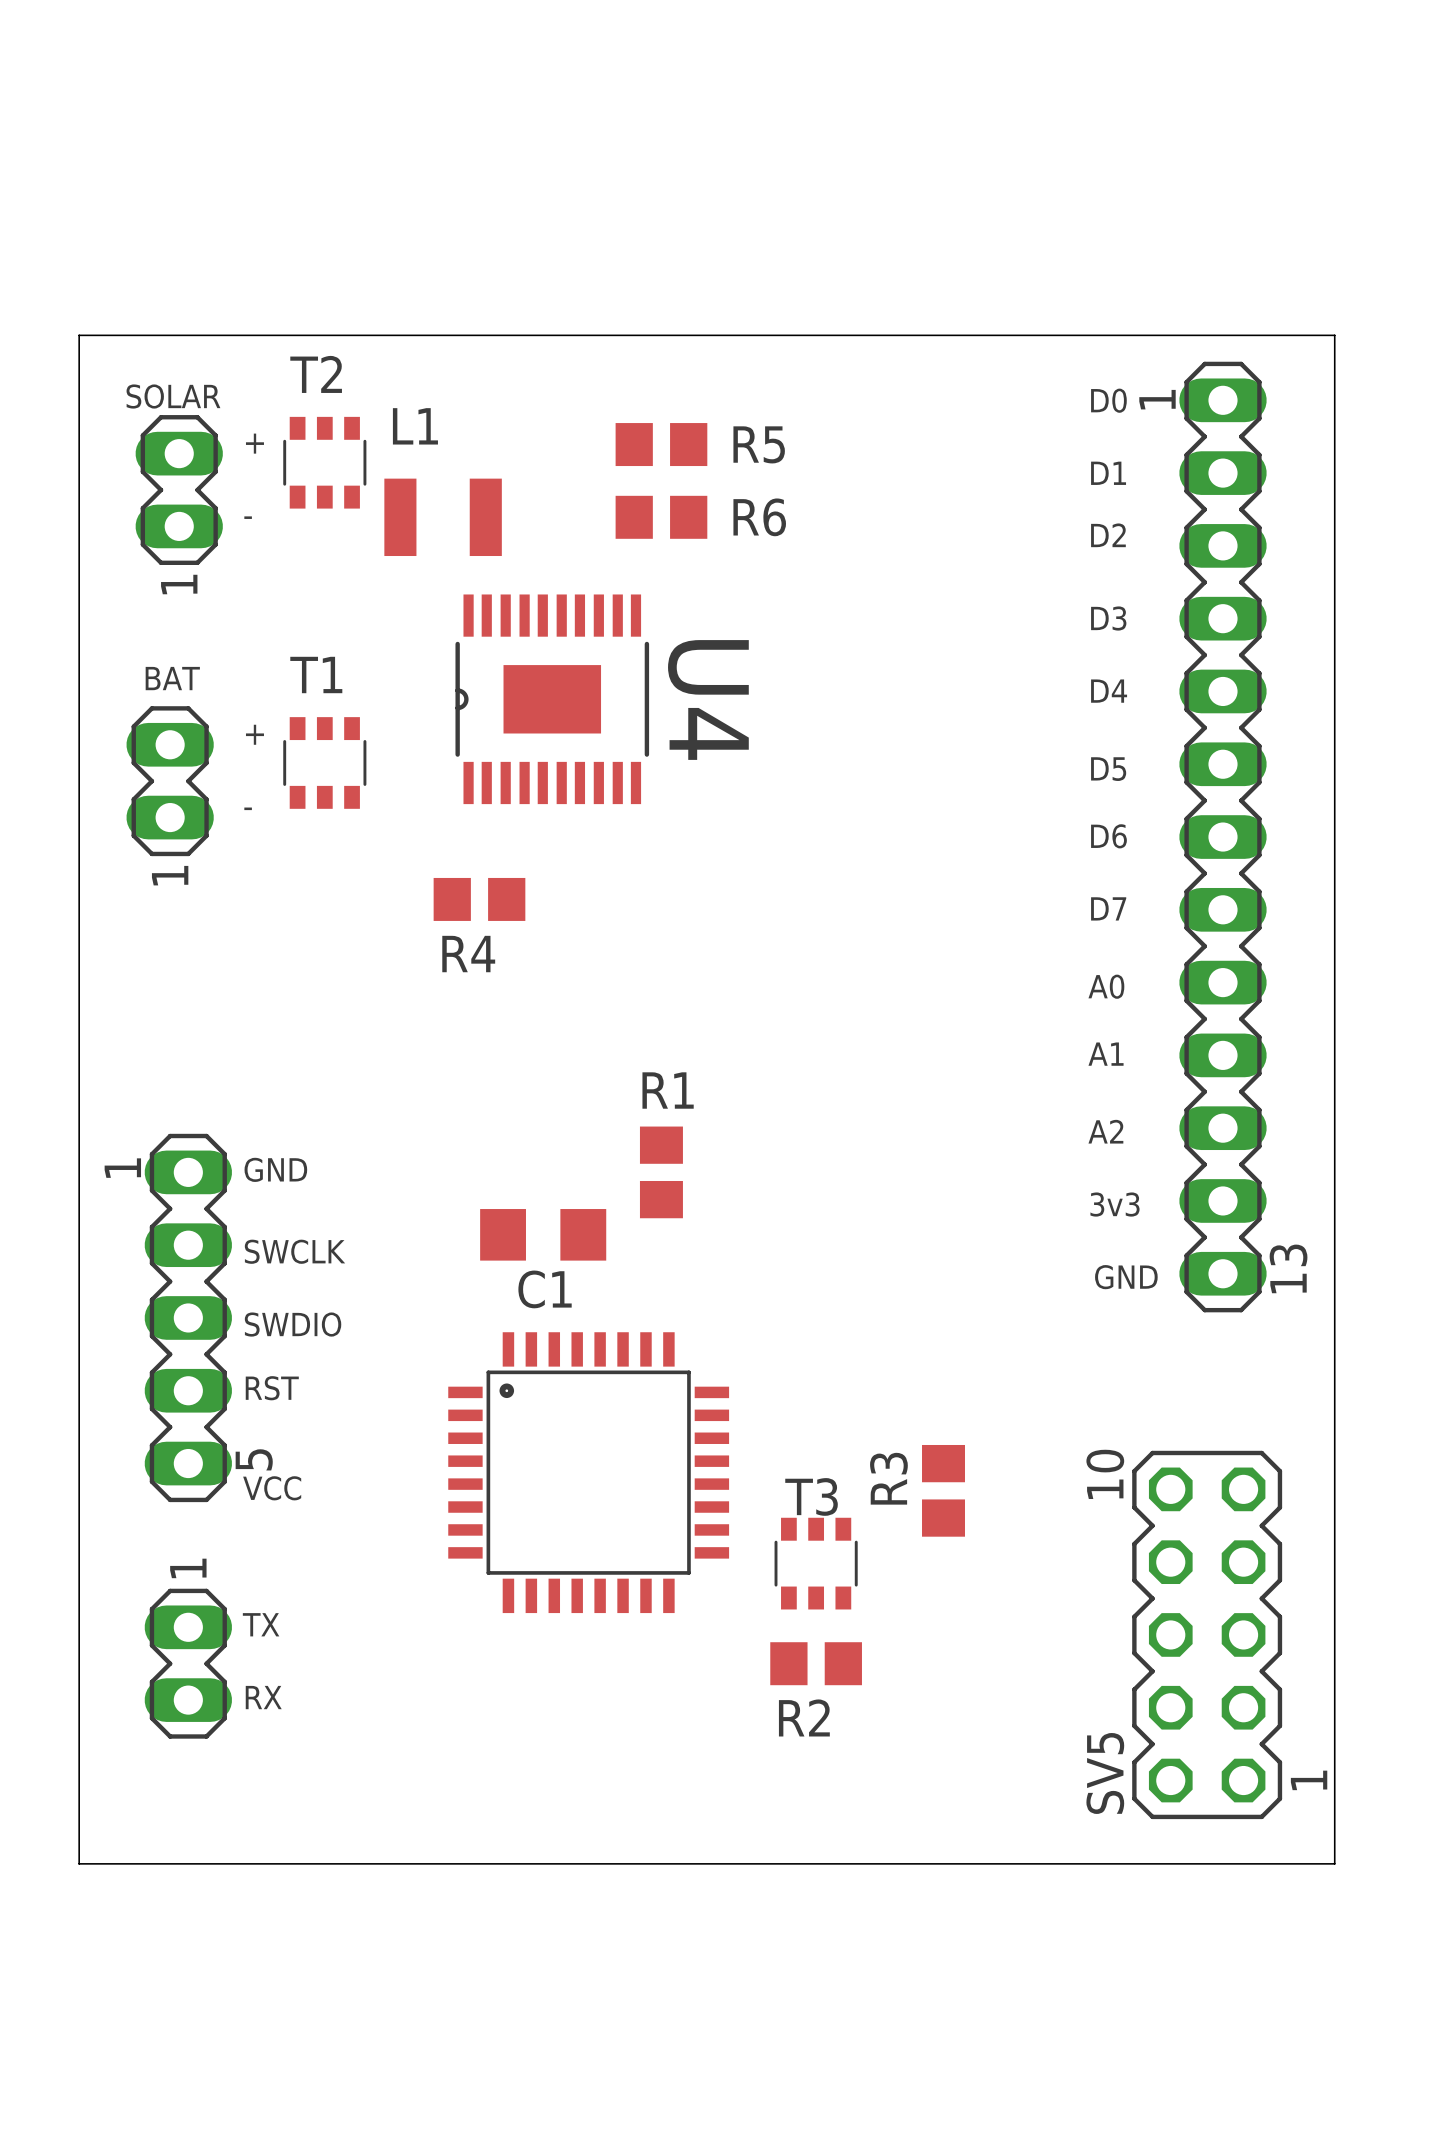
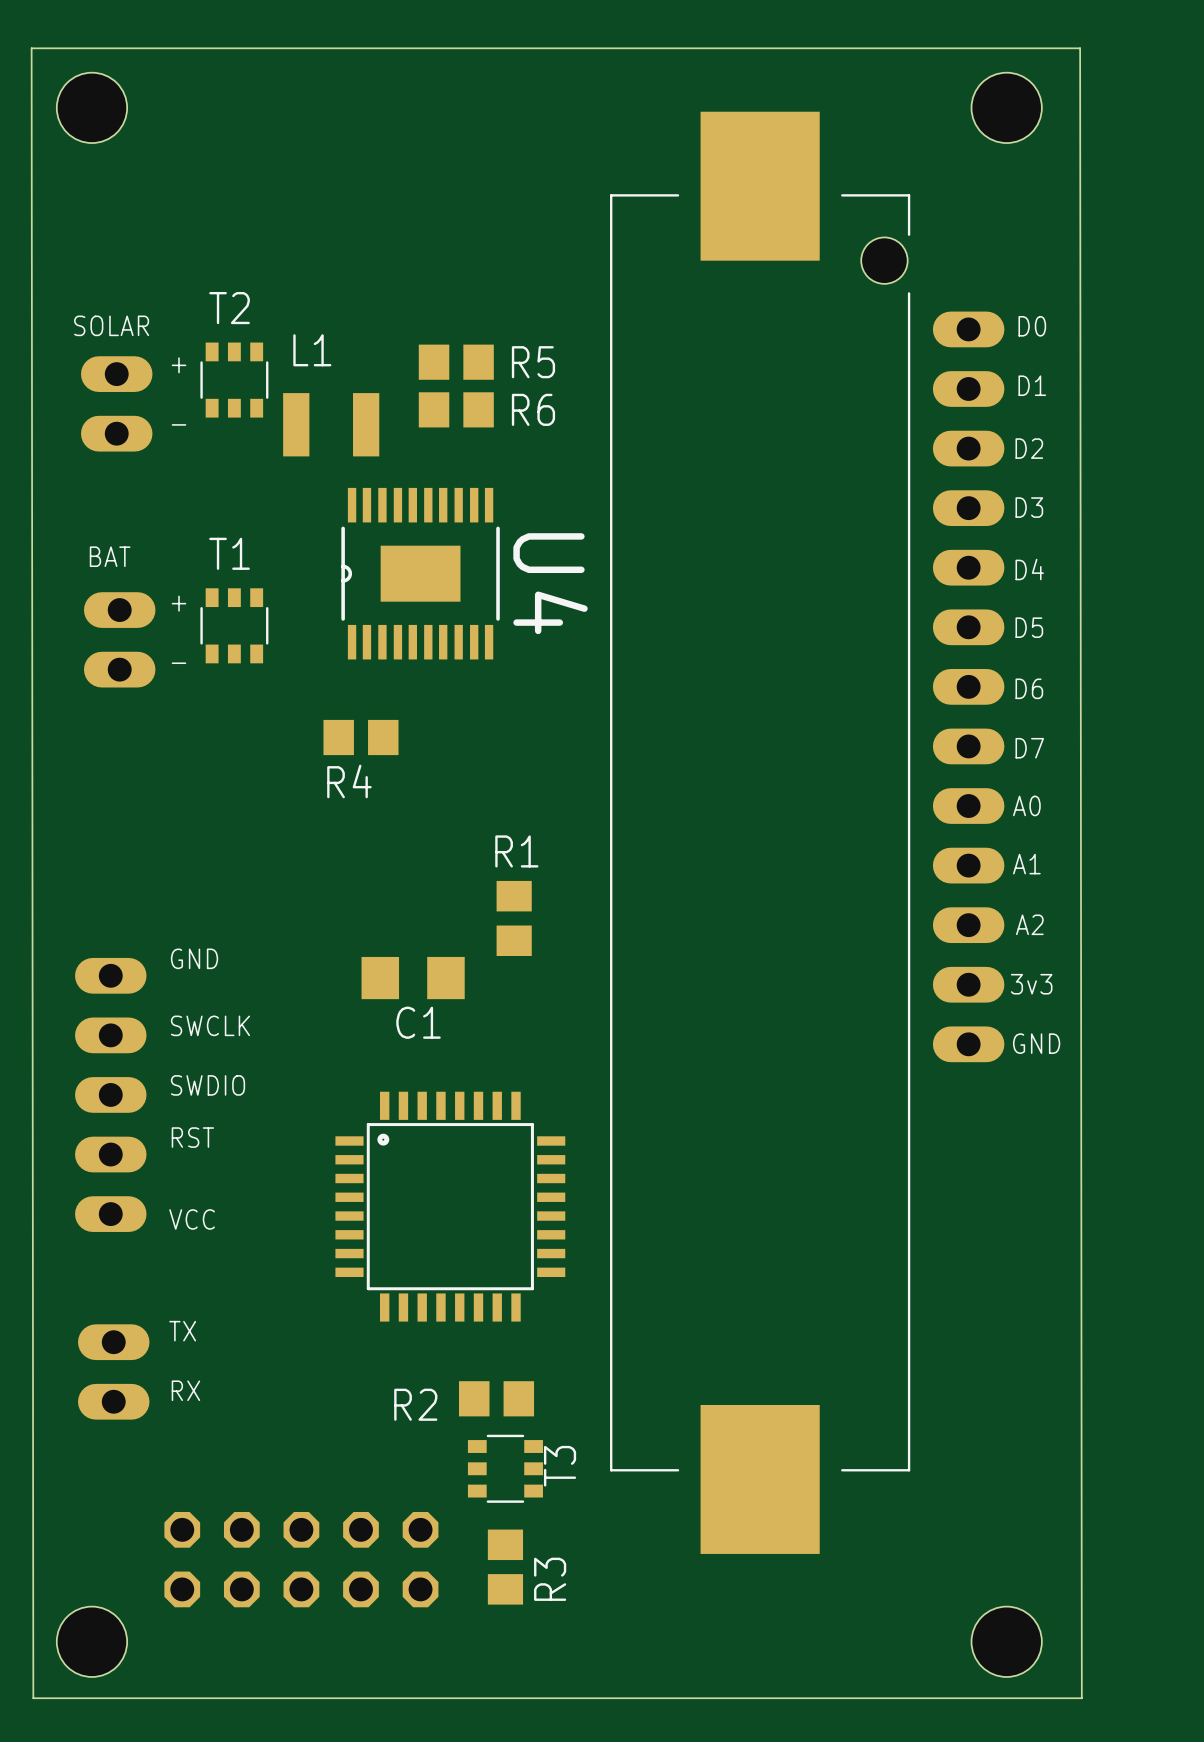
hole: none -> (91, 107)
hole: none -> (1006, 107)
board edge: (79, 335) (1334, 335) (1334, 1863) (79, 1863) (79, 335) -> (31, 48) (33, 1698) (1081, 1698) (1080, 48) (31, 48)
part footprint: [1179, 361, 1267, 1313] -> [932, 311, 1005, 1063]
text position: D0 (1108, 400) -> D0 (1032, 326)
part footprint: [135, 415, 223, 565] -> [80, 356, 153, 452]
R5 position: (661, 444) -> (456, 362)
text position: D1 (1108, 473) -> D1 (1032, 385)
R6 position: (661, 517) -> (456, 409)
text position: D2 (1108, 535) -> D2 (1029, 448)
text position: D3 (1108, 618) -> D3 (1029, 507)
text position: D4 (1109, 691) -> D4 (1029, 569)
part footprint: [126, 706, 214, 857] -> [83, 592, 156, 688]
text position: D5 (1108, 769) -> D5 (1029, 627)
text position: D6 (1108, 836) -> D6 (1029, 688)
text position: D7 (1108, 908) -> D7 (1029, 748)
text position: A0 (1106, 986) -> A0 (1026, 805)
part: none -> (760, 832)
text position: A1 (1106, 1054) -> A1 (1026, 864)
text position: A2 (1105, 1131) -> A2 (1029, 924)
part footprint: [144, 1133, 233, 1503] -> [75, 957, 147, 1232]
R1 position: (661, 1172) -> (514, 918)
text position: 3v3 (1115, 1204) -> 3v3 (1031, 984)
C1 position: (543, 1234) -> (413, 978)
text position: GND (1126, 1277) -> GND (1036, 1043)
R3 name position: R3 (888, 1478) -> R3 (550, 1579)
R3 position: (943, 1490) -> (505, 1567)
T3 rotation: 0° (816, 1563) -> 90° clockwise (505, 1468)
T3 position: (816, 1563) -> (505, 1468)
part footprint: [144, 1588, 233, 1739] -> [78, 1324, 150, 1420]
SV5: (1207, 1634) -> none
R2 position: (816, 1663) -> (496, 1398)
R2 name position: R2 (804, 1717) -> R2 (415, 1404)
part: none -> (301, 1559)
hole: none -> (91, 1641)
hole: none -> (1006, 1641)

